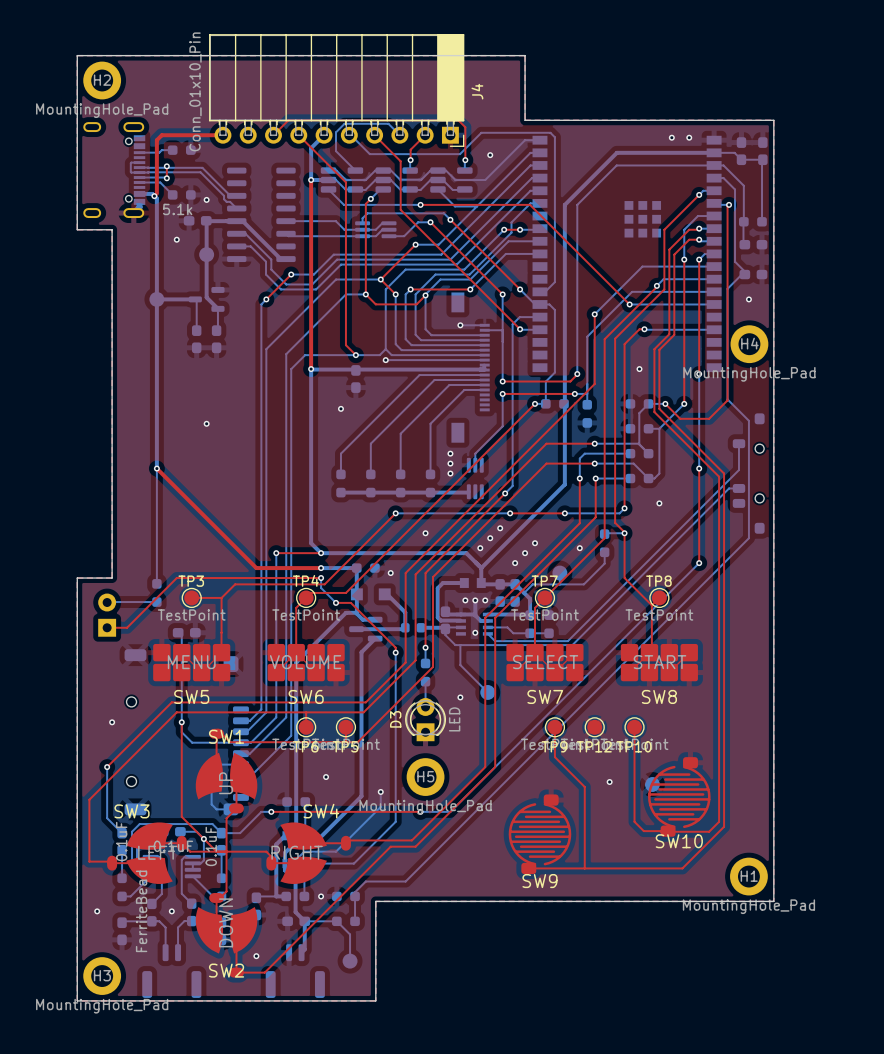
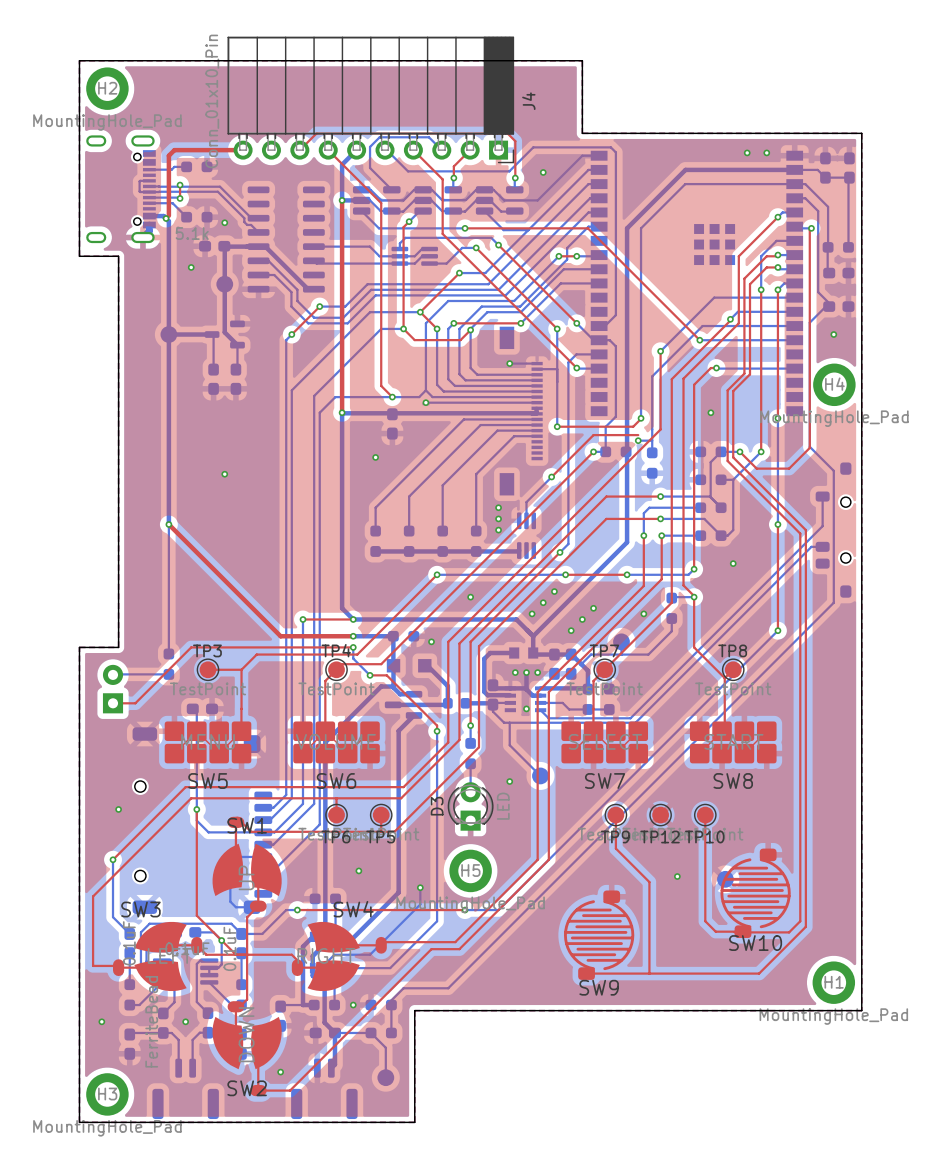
top track: none -> (638, 435) (593, 435) (551, 477)
bottom track: (502, 393) (502, 426) (475, 453) -> (551, 477) (526, 502) (526, 507)
top track: (502, 393) (574, 393) -> none
via position: (502, 393) -> (551, 477)

